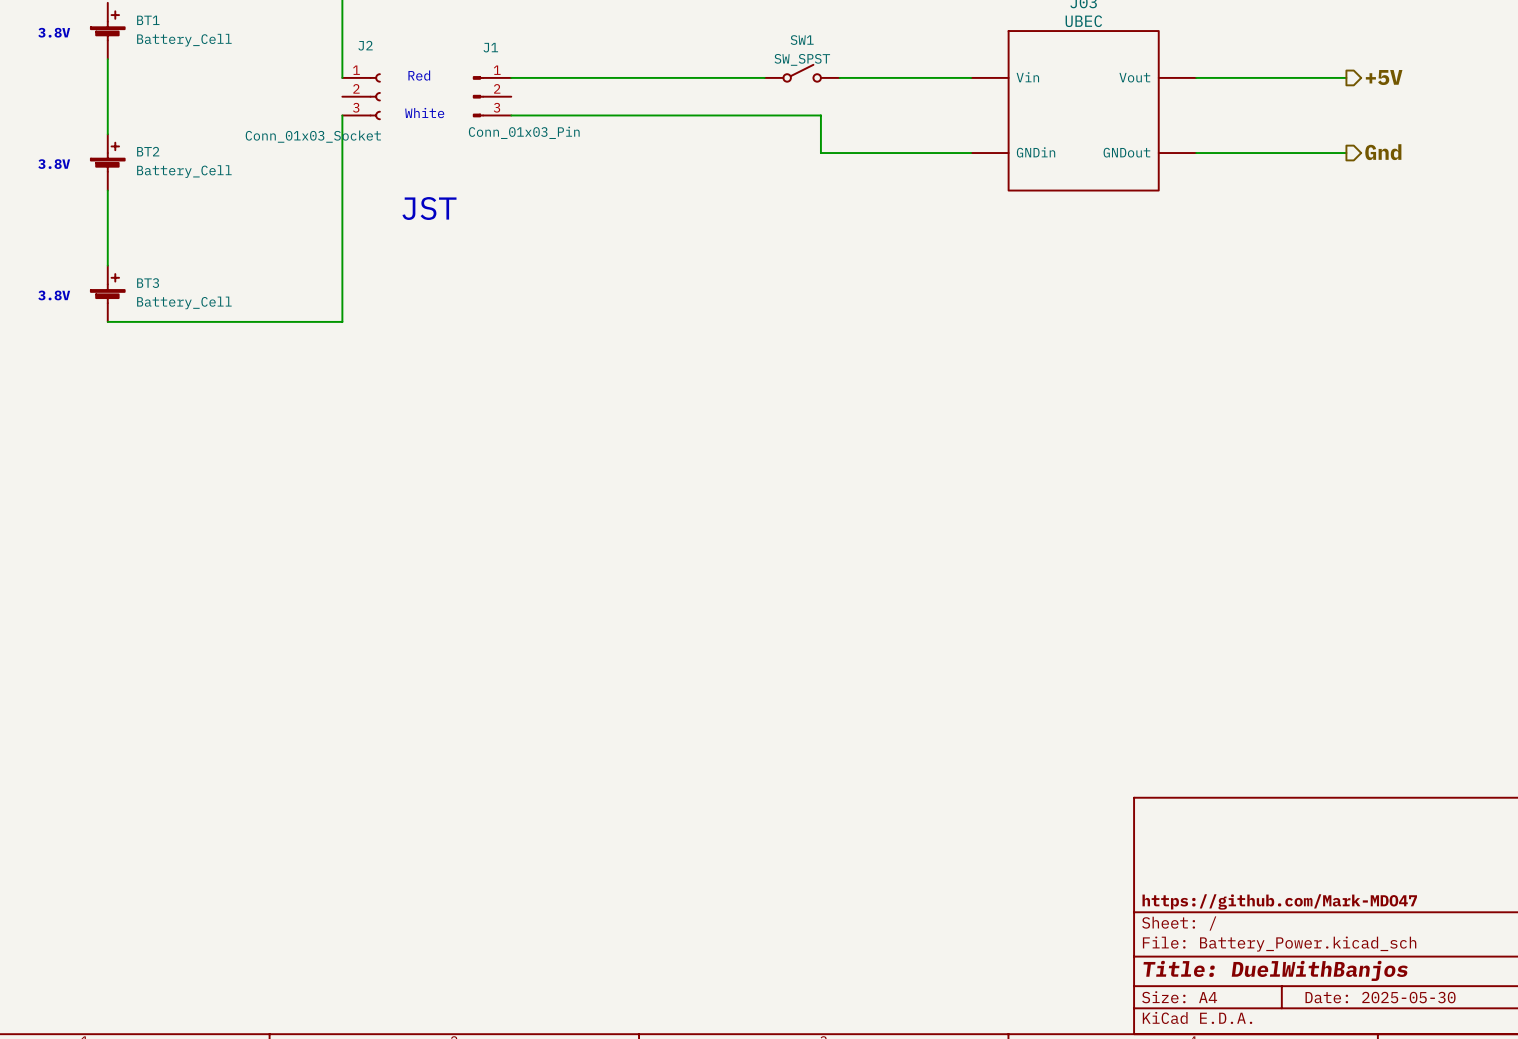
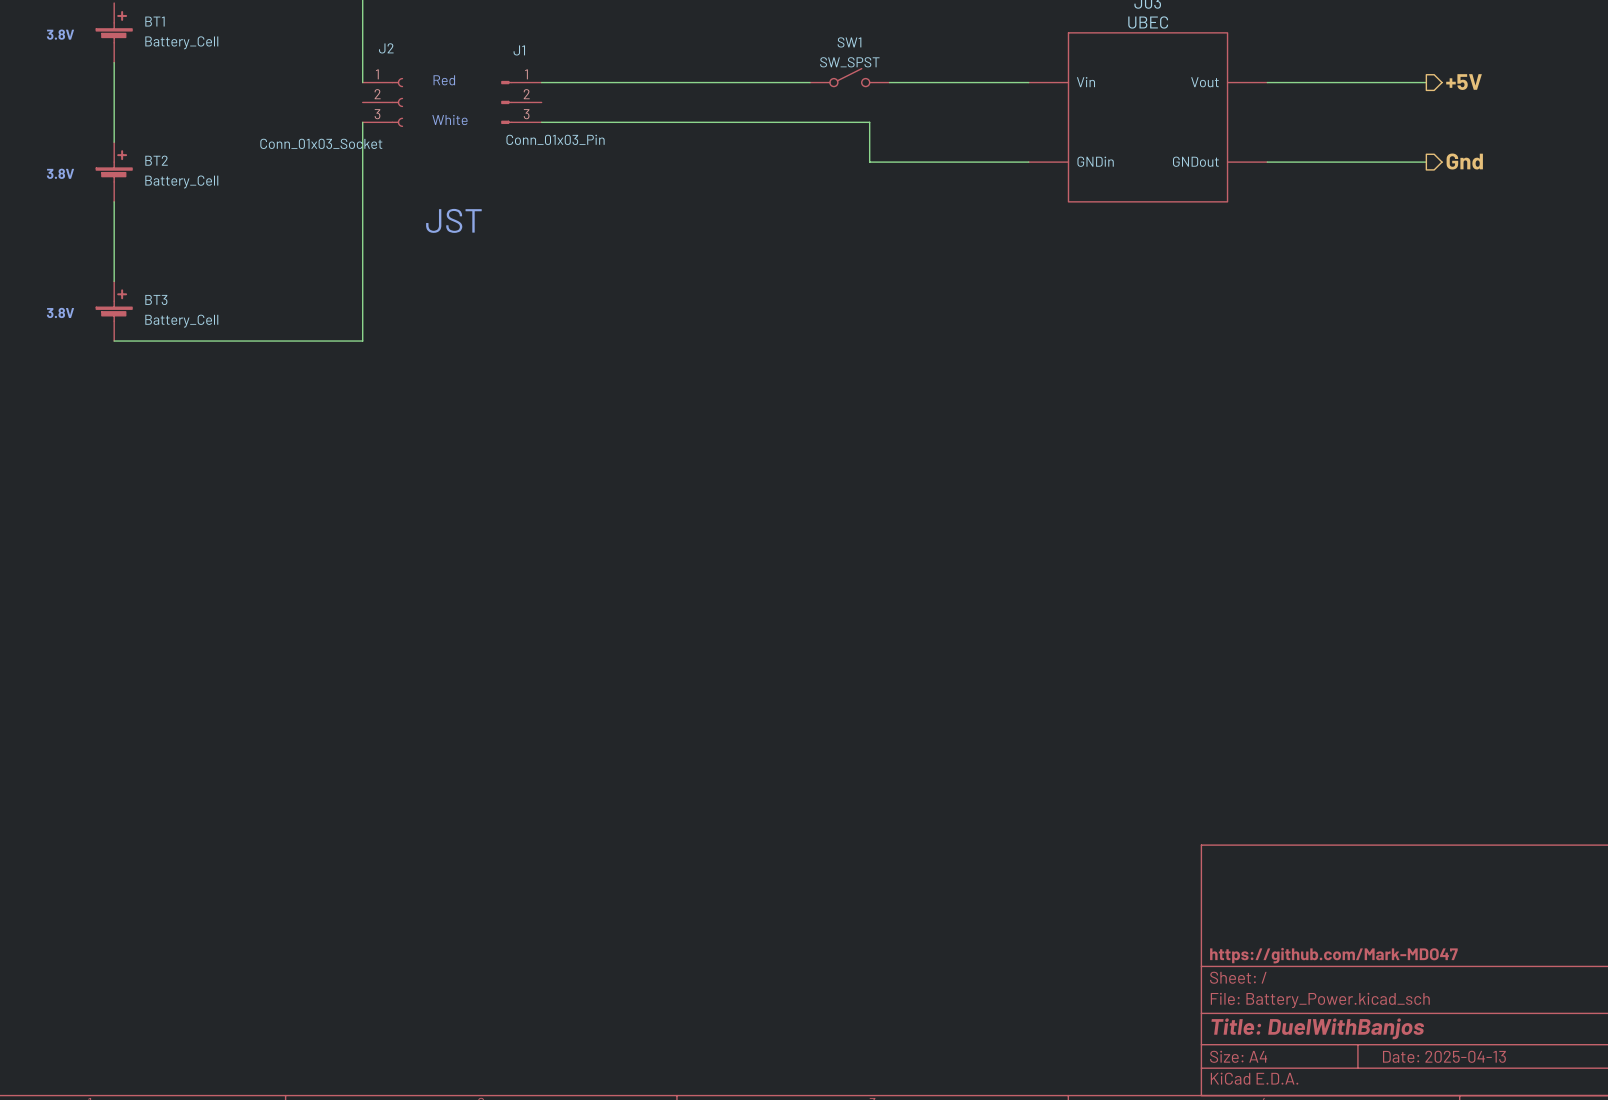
title block: Date: 2025-05-30 (1380, 997) -> Date: 2025-04-13 (1444, 1056)

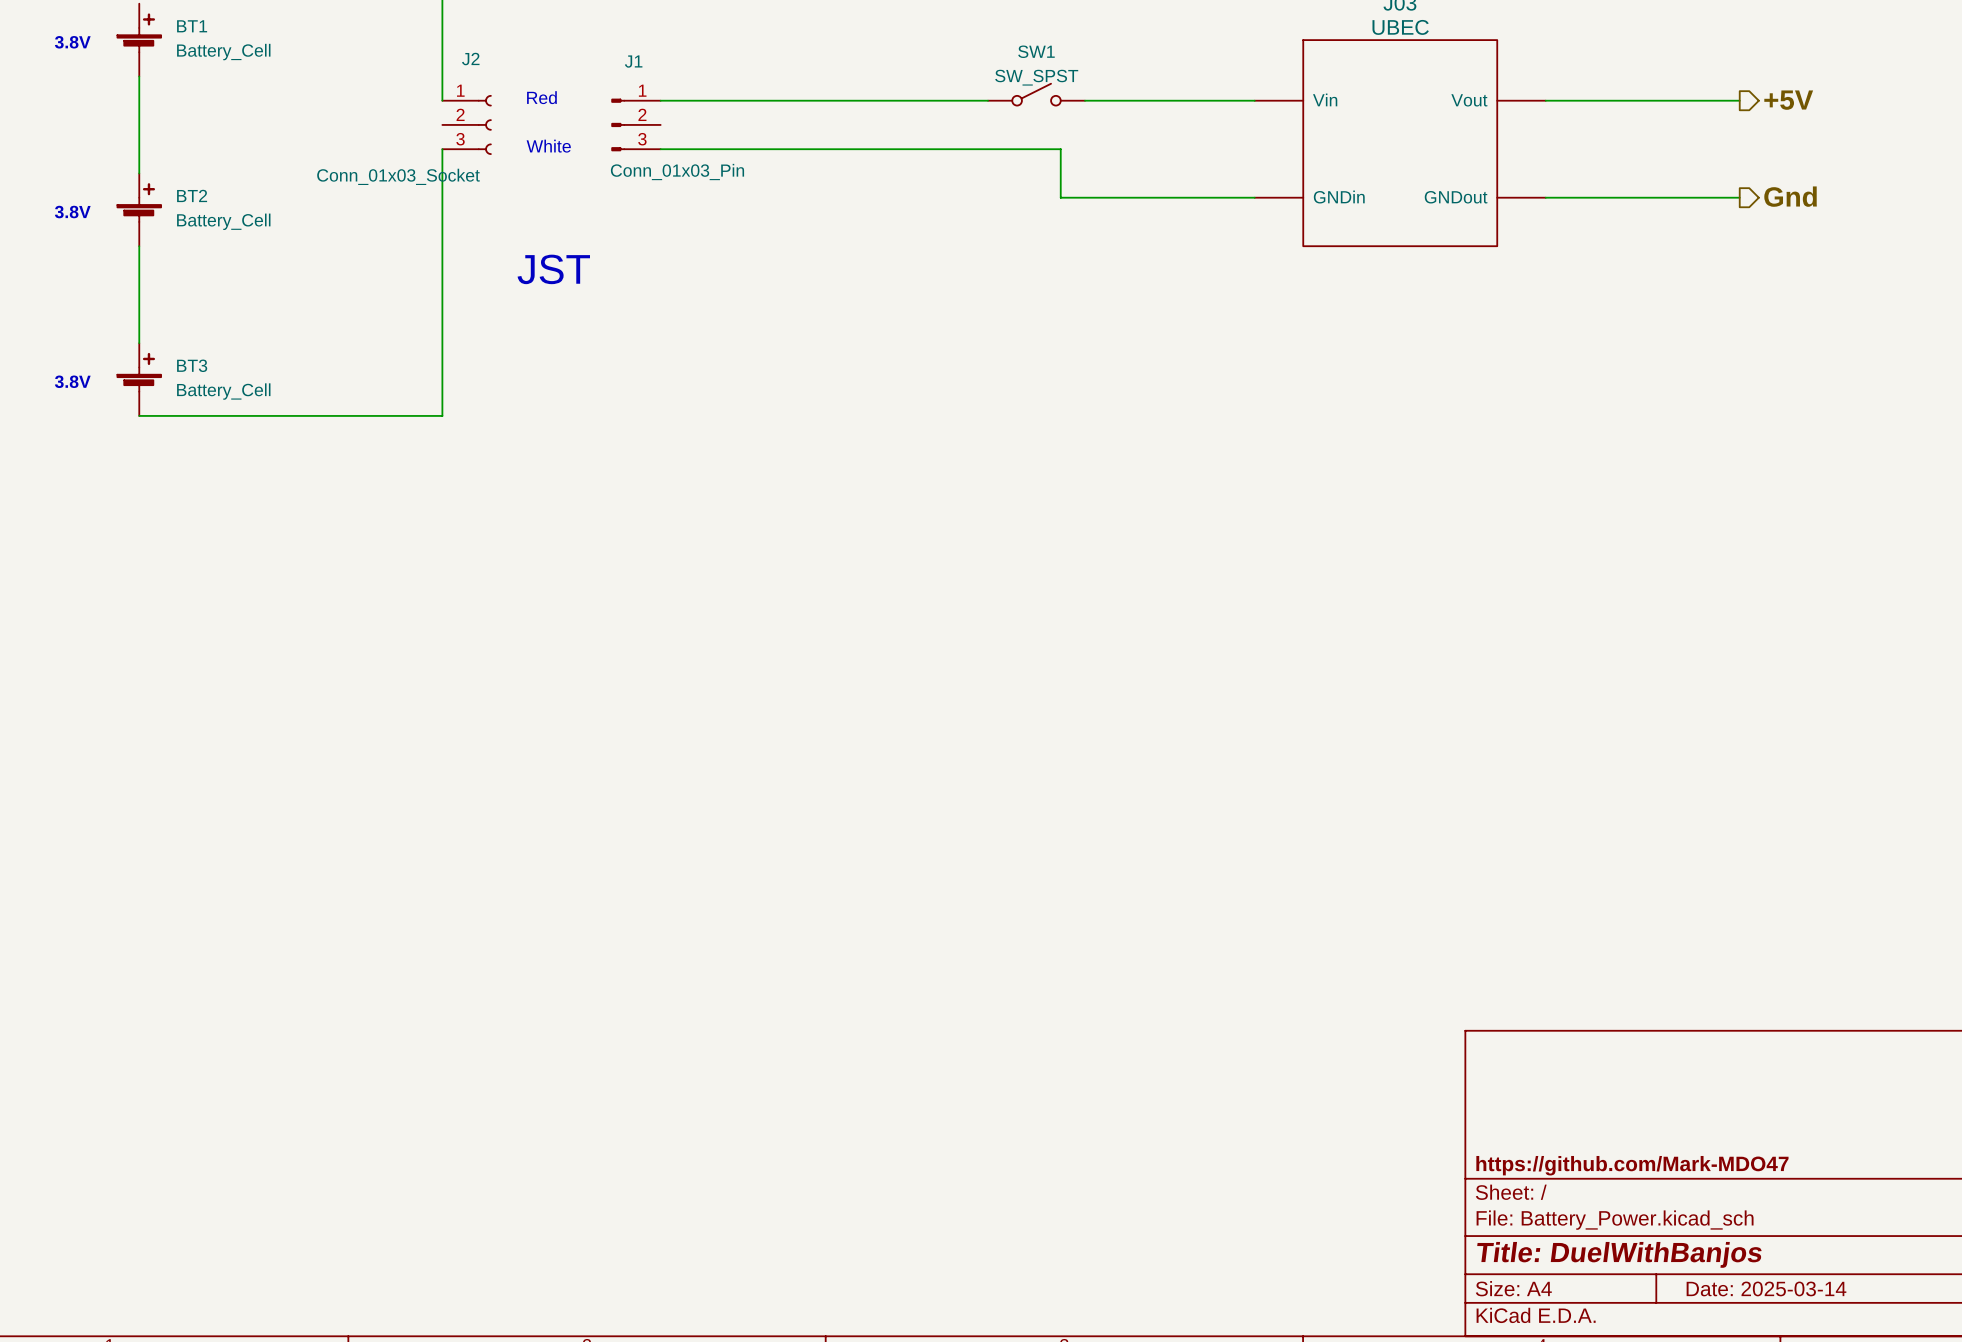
title block: Date: 2025-04-13 (1444, 1056) -> Date: 2025-03-14 (1766, 1288)

